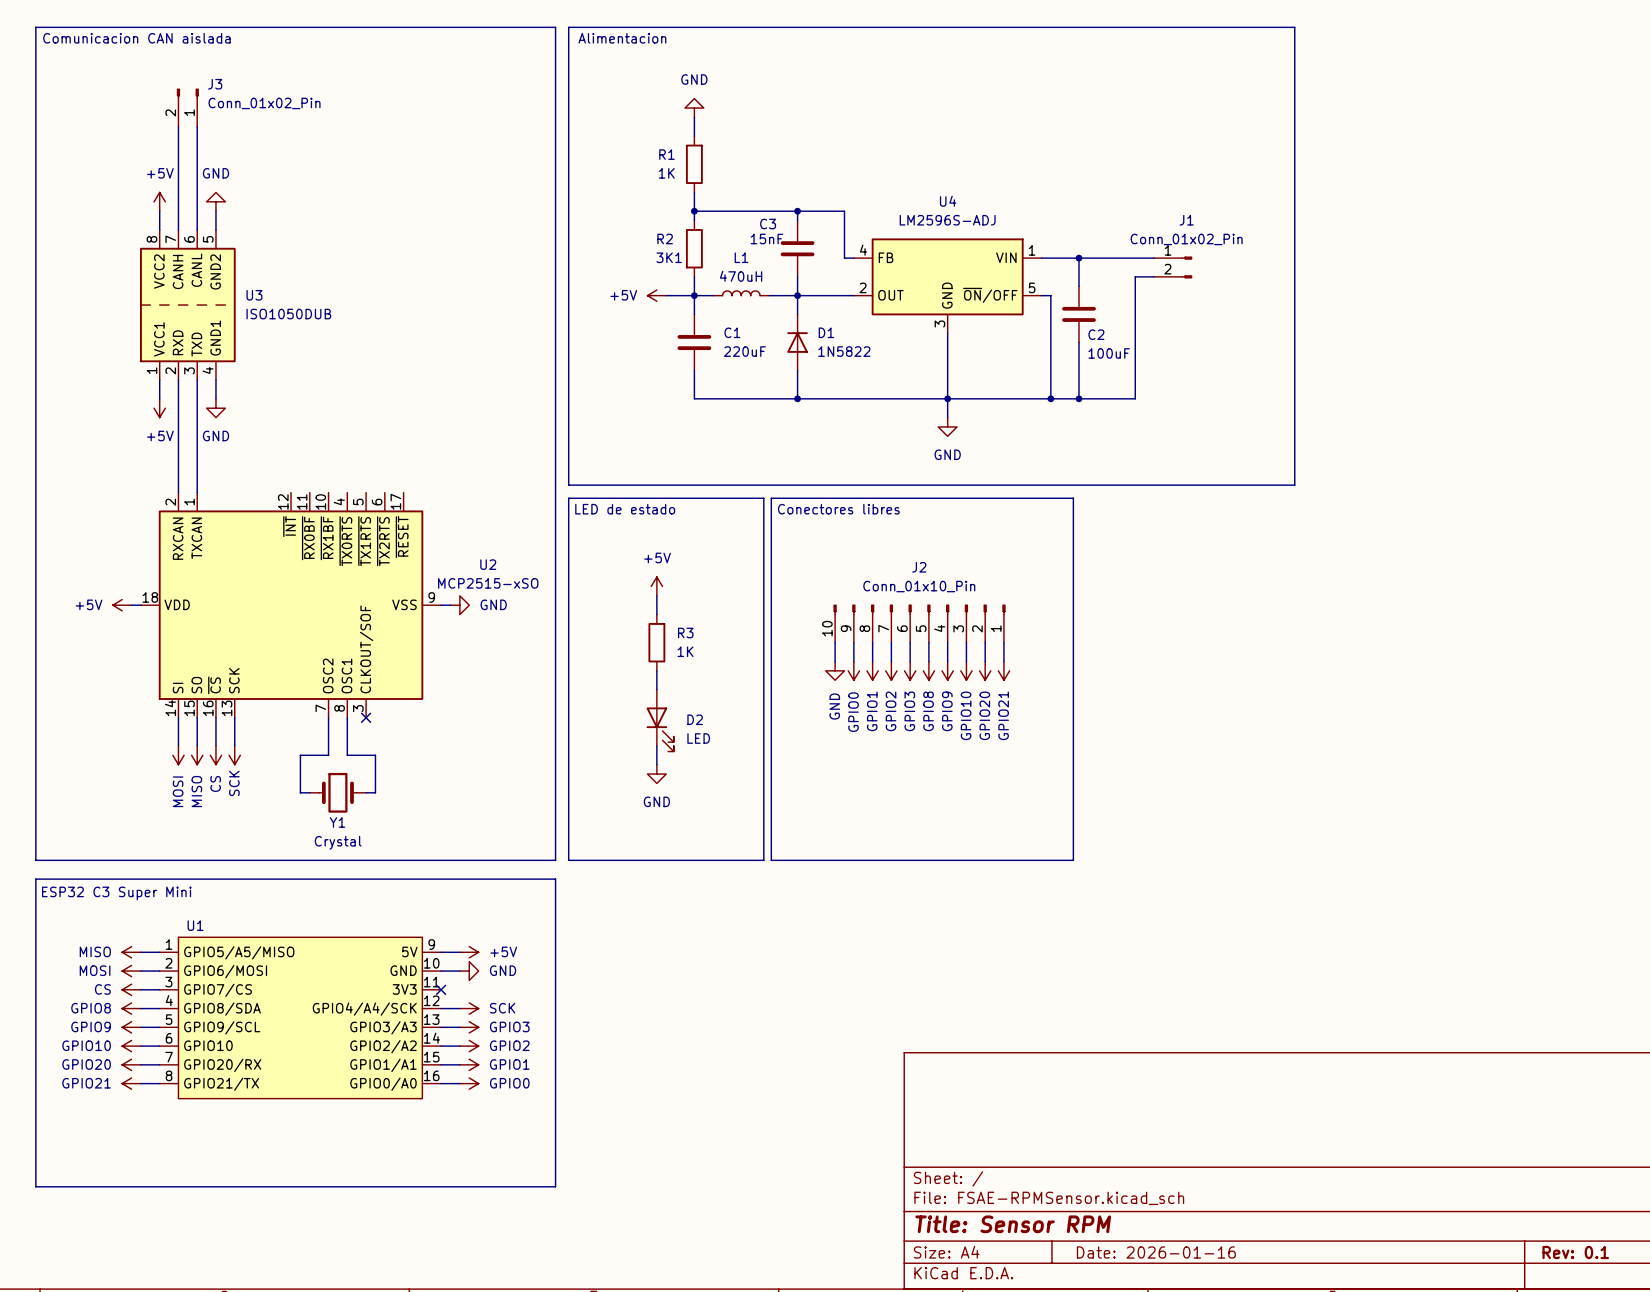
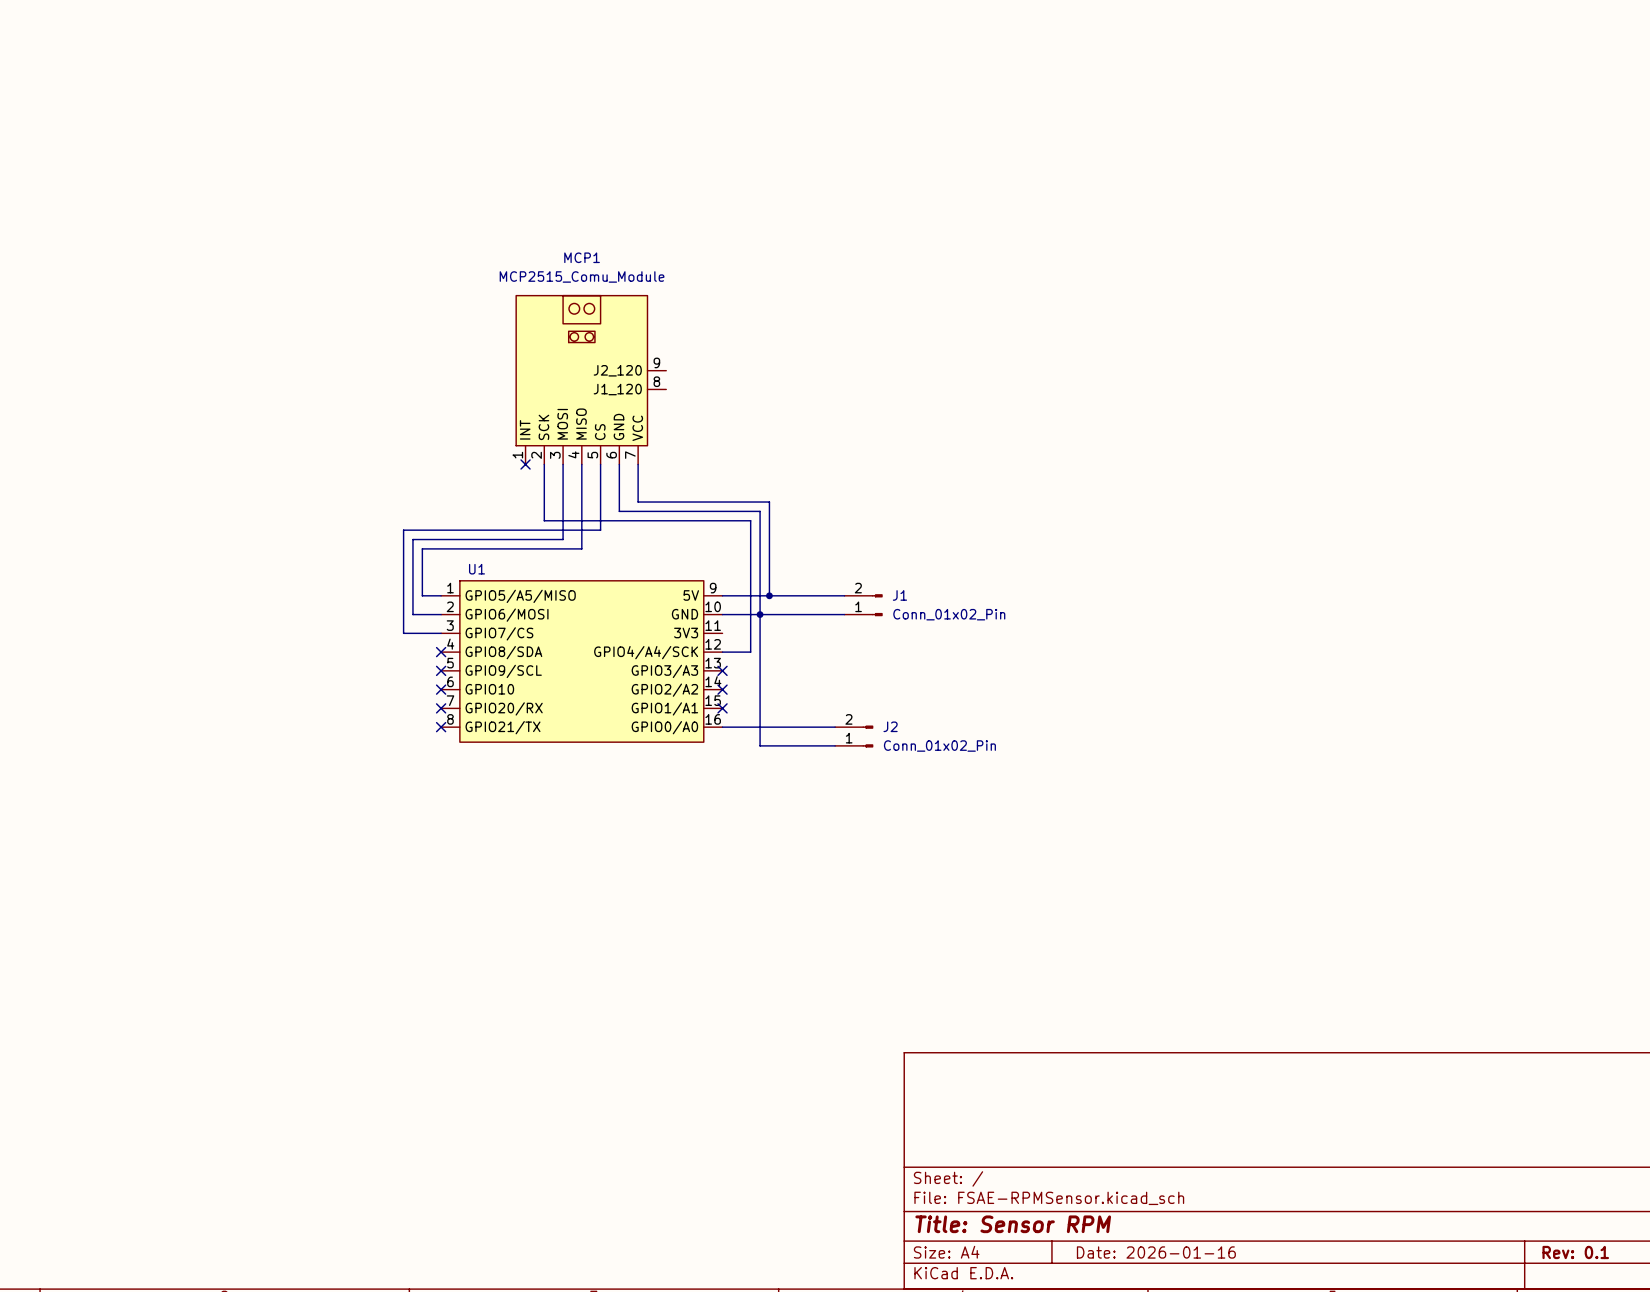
line: (35, 27) (555, 27) (555, 860) (35, 860) (35, 27) -> none
line: (568, 27) (1294, 27) (1294, 485) (568, 485) (568, 27) -> none
text: Comunicacion CAN aislada (136, 38) -> none
text: Alimentacion (622, 38) -> none
J3: Conn_01x02_Pin (187, 107) -> none
power symbol: GND (694, 108) -> none
wire: (694, 117) (694, 136) -> none
wire: (178, 126) (178, 229) -> none
wire: (197, 126) (197, 229) -> none
R1: 1K (694, 164) -> none
wire: (694, 192) (694, 220) -> none
power symbol: +5V (159, 201) -> none
power symbol: GND (215, 201) -> none
wire: (159, 211) (159, 229) -> none
wire: (215, 211) (215, 229) -> none
wire: (694, 211) (844, 211) (844, 258) (853, 258) -> none
junction: (694, 211) -> none
wire: (797, 211) (797, 220) -> none
junction: (797, 211) -> none
J1 name position: J1 (1186, 220) -> J1 (899, 595)
J1 value position: Conn_01x02_Pin (1186, 239) -> Conn_01x02_Pin (949, 614)
R2: 3K1 (694, 248) -> none
C3: 15nF (797, 248) -> none
wire: (1041, 258) (1154, 258) -> none
wire: (1079, 258) (1079, 286) -> none
junction: (1079, 258) -> none
J1 position: (1173, 267) -> (863, 605)
J1 flip: as is (1186, 267) -> up-down (877, 605)
wire: (694, 276) (694, 314) -> none
wire: (797, 276) (797, 314) -> none
wire: (1154, 276) (1135, 276) (1135, 398) (694, 398) (694, 370) -> none
U4: LM2596S-ADJ (947, 285) -> none
L1: 470uH (741, 293) -> none
power symbol: +5V (656, 295) -> none
wire: (666, 295) (713, 295) -> none
junction: (694, 295) -> none
wire: (769, 295) (853, 295) -> none
junction: (797, 295) -> none
wire: (1041, 295) (1050, 295) (1050, 398) -> none
U3: ISO1050DUB (187, 305) -> none
C2: 100uF (1079, 314) -> none
wire: (947, 333) (947, 417) -> none
C1: 220uF (694, 342) -> none
D1: 1N5822 (797, 342) -> none
wire: (1079, 342) (1079, 398) -> none
wire: (797, 370) (797, 398) -> none
MCP1: none -> MCP2515_Comu_Module (591, 379)
wire: (159, 380) (159, 398) -> none
wire: (178, 380) (178, 492) -> none
wire: (197, 380) (197, 492) -> none
wire: (215, 380) (215, 398) -> none
junction: (797, 398) -> none
junction: (947, 398) -> none
junction: (1050, 398) -> none
junction: (1079, 398) -> none
power symbol: +5V (159, 408) -> none
power symbol: GND (215, 408) -> none
power symbol: GND (947, 426) -> none
no-connect mark: none -> (525, 464)
wire: none -> (544, 464) (544, 520) (750, 520) (750, 652) (722, 652)
wire: none -> (563, 464) (563, 539) (412, 539) (412, 614) (441, 614)
wire: none -> (581, 464) (581, 548) (422, 548) (422, 595) (441, 595)
wire: none -> (600, 464) (600, 530) (403, 530) (403, 633) (441, 633)
wire: none -> (619, 464) (619, 511) (760, 511) (760, 745) (835, 745)
wire: none -> (638, 464) (638, 502) (769, 502) (769, 595)
line: (568, 498) (568, 860) (763, 860) (763, 498) (568, 498) -> none
line: (771, 498) (1073, 498) (1073, 860) (771, 860) (771, 498) -> none
text: LED de estado (625, 509) -> none
text: Conectores libres (838, 509) -> none
J2 name position: J2 (919, 567) -> J2 (890, 726)
power symbol: +5V (656, 586) -> none
J2 value: Conn_01x10_Pin (919, 586) -> Conn_01x02_Pin (939, 746)
wire: none -> (722, 595) (844, 595)
junction: none -> (769, 595)
J2 symbol: [833, 604, 1006, 643] -> [835, 725, 874, 748]
power symbol: +5V (122, 605) -> none
wire: (131, 605) (140, 605) -> none
U2: MCP2515-xSO (291, 605) -> none
wire: (441, 605) (450, 605) -> none
power symbol: GND (459, 605) -> none
wire: none -> (722, 614) (844, 614)
junction: none -> (760, 614)
R3: 1K (656, 642) -> none
wire: (835, 642) (835, 661) -> none
wire: (853, 642) (853, 661) -> none
wire: (872, 642) (872, 661) -> none
wire: (891, 642) (891, 661) -> none
wire: (910, 642) (910, 661) -> none
wire: (928, 642) (928, 661) -> none
wire: (947, 642) (947, 661) -> none
wire: (966, 642) (966, 661) -> none
wire: (985, 642) (985, 661) -> none
wire: (1003, 642) (1003, 661) -> none
no-connect mark: none -> (441, 652)
no-connect mark: none -> (441, 670)
no-connect mark: none -> (722, 670)
power symbol: GND (835, 670) -> none
power symbol: GPIO0 (853, 670) -> none
power symbol: GPIO1 (872, 670) -> none
power symbol: GPIO2 (891, 670) -> none
power symbol: GPIO3 (910, 670) -> none
power symbol: GPIO8 (928, 670) -> none
power symbol: GPIO9 (947, 670) -> none
power symbol: GPIO10 (966, 670) -> none
power symbol: GPIO20 (985, 670) -> none
power symbol: GPIO21 (1003, 670) -> none
no-connect mark: none -> (441, 689)
no-connect mark: none -> (722, 689)
no-connect mark: none -> (441, 708)
no-connect mark: none -> (722, 708)
wire: (178, 717) (178, 745) -> none
wire: (197, 717) (197, 745) -> none
wire: (215, 717) (215, 745) -> none
wire: (234, 717) (234, 745) -> none
wire: (328, 717) (328, 755) (300, 755) (300, 792) (309, 792) -> none
wire: (347, 717) (347, 755) (375, 755) (375, 792) (366, 792) -> none
no-connect mark: (366, 717) -> none
D2: LED (660, 720) -> none
no-connect mark: none -> (441, 727)
wire: none -> (722, 727) (835, 727)
wire: (656, 745) (656, 764) -> none
power symbol: MOSI (178, 755) -> none
power symbol: MISO (197, 755) -> none
power symbol: CS (215, 755) -> none
power symbol: SCK (234, 755) -> none
power symbol: GND (656, 774) -> none
Y1: Crystal (337, 792) -> none
line: (35, 879) (35, 1186) (555, 1186) (555, 879) (35, 879) -> none
text: ESP32 C3 Super Mini (116, 893) -> none
power symbol: MISO (131, 952) -> none
wire: (140, 952) (159, 952) -> none
wire: (441, 952) (459, 952) -> none
power symbol: +5V (469, 952) -> none
power symbol: MOSI (131, 971) -> none
wire: (140, 971) (159, 971) -> none
wire: (441, 971) (459, 971) -> none
power symbol: GND (469, 971) -> none
power symbol: CS (131, 989) -> none
wire: (140, 989) (159, 989) -> none
no-connect mark: (441, 989) -> none
power symbol: GPIO8 (131, 1008) -> none
wire: (140, 1008) (159, 1008) -> none
wire: (441, 1008) (459, 1008) -> none
power symbol: SCK (469, 1008) -> none
U1 position: (300, 1017) -> (581, 661)
power symbol: GPIO9 (131, 1027) -> none
wire: (140, 1027) (159, 1027) -> none
wire: (441, 1027) (459, 1027) -> none
power symbol: GPIO3 (469, 1027) -> none
power symbol: GPIO10 (131, 1046) -> none
wire: (140, 1046) (159, 1046) -> none
wire: (441, 1046) (459, 1046) -> none
power symbol: GPIO2 (469, 1046) -> none
power symbol: GPIO20 (131, 1064) -> none
wire: (140, 1064) (159, 1064) -> none
wire: (441, 1064) (459, 1064) -> none
power symbol: GPIO1 (469, 1064) -> none
power symbol: GPIO21 (131, 1083) -> none
wire: (140, 1083) (159, 1083) -> none
wire: (441, 1083) (459, 1083) -> none
power symbol: GPIO0 (469, 1083) -> none

